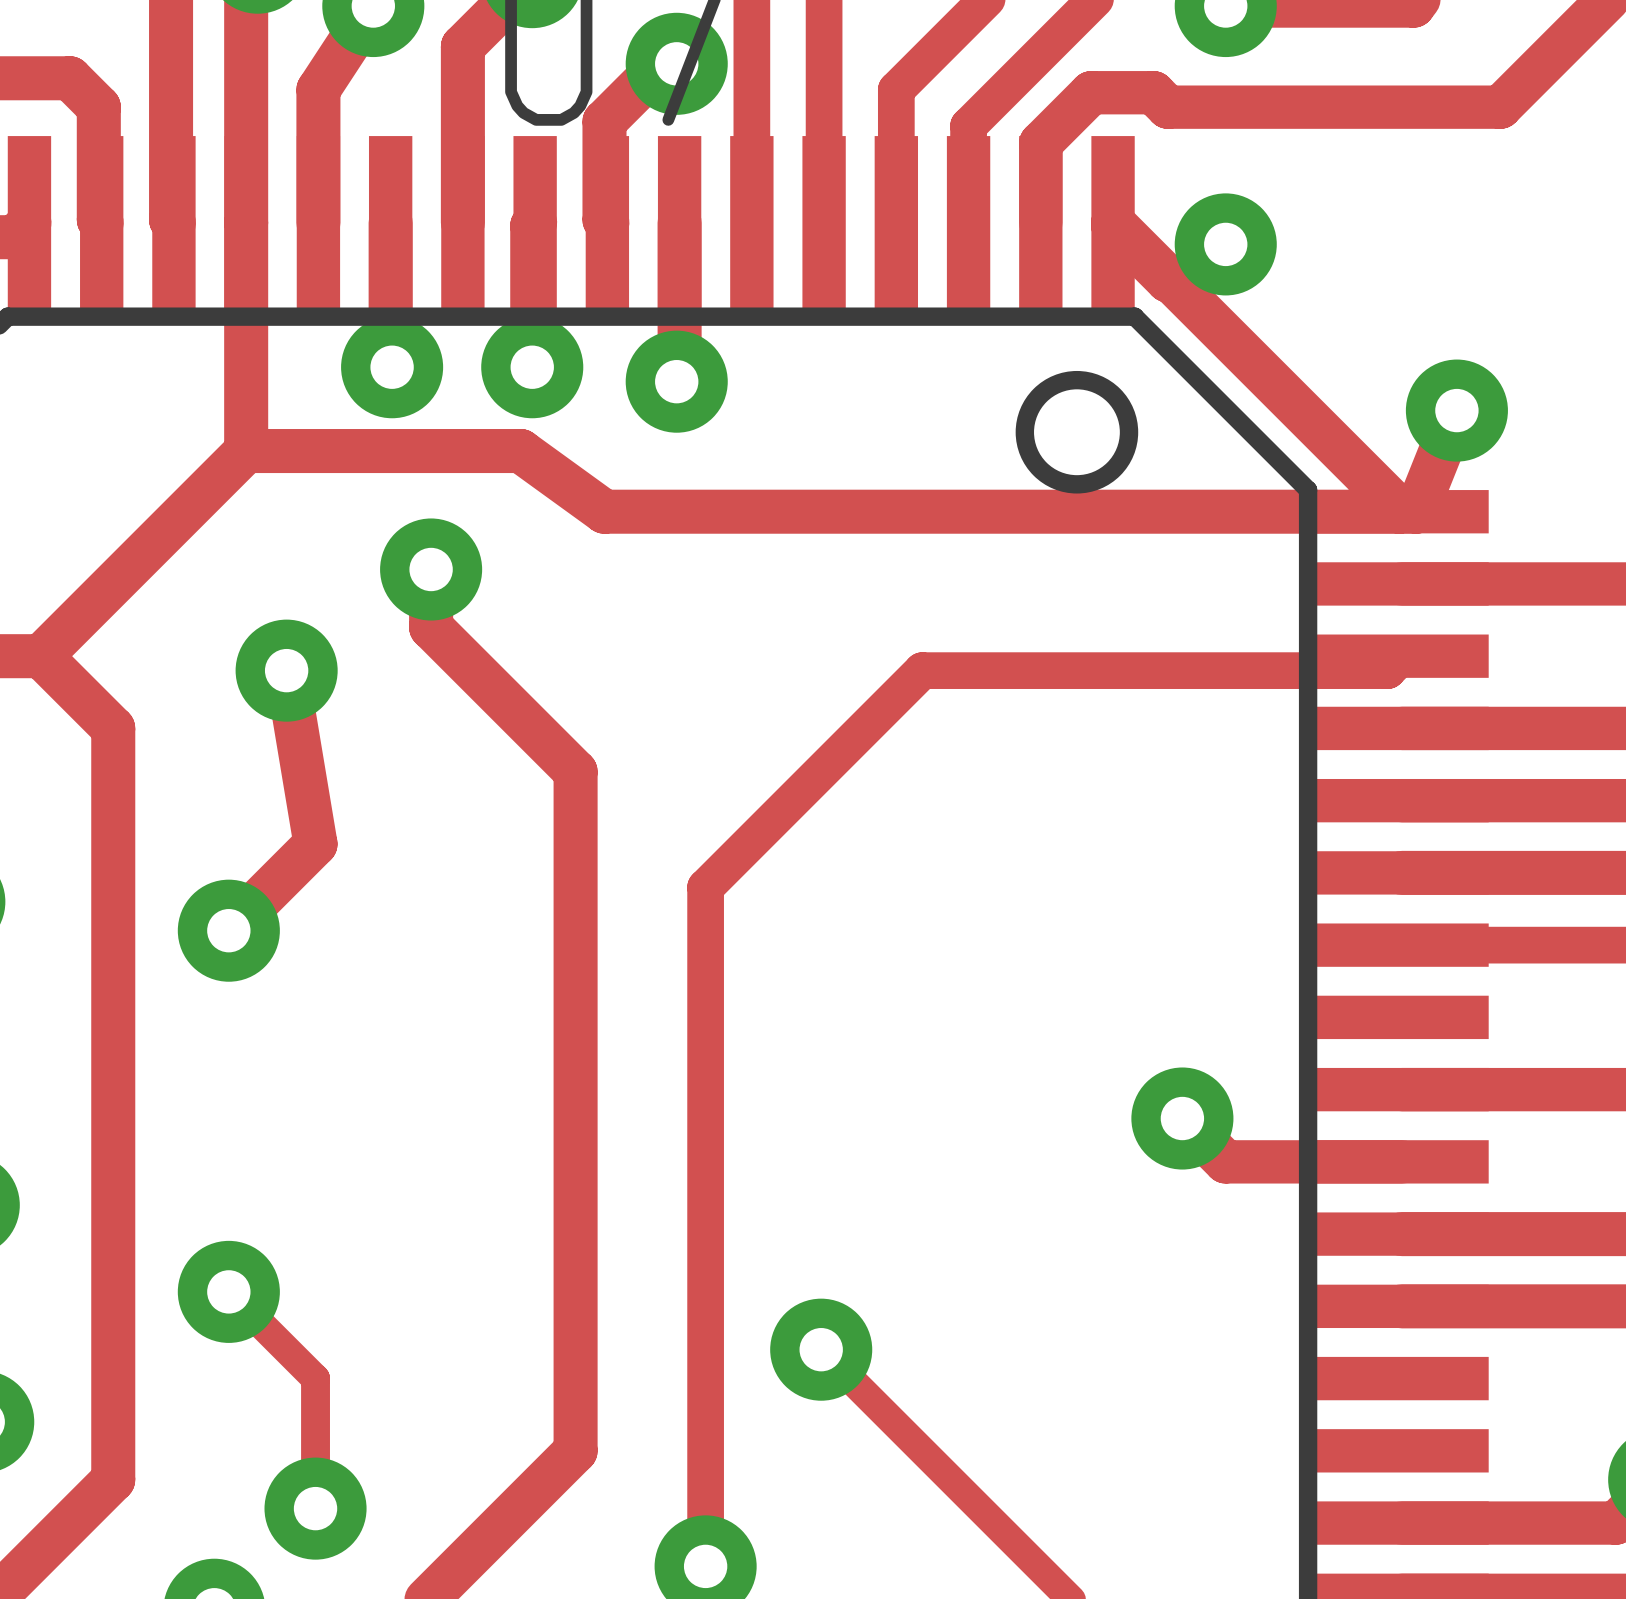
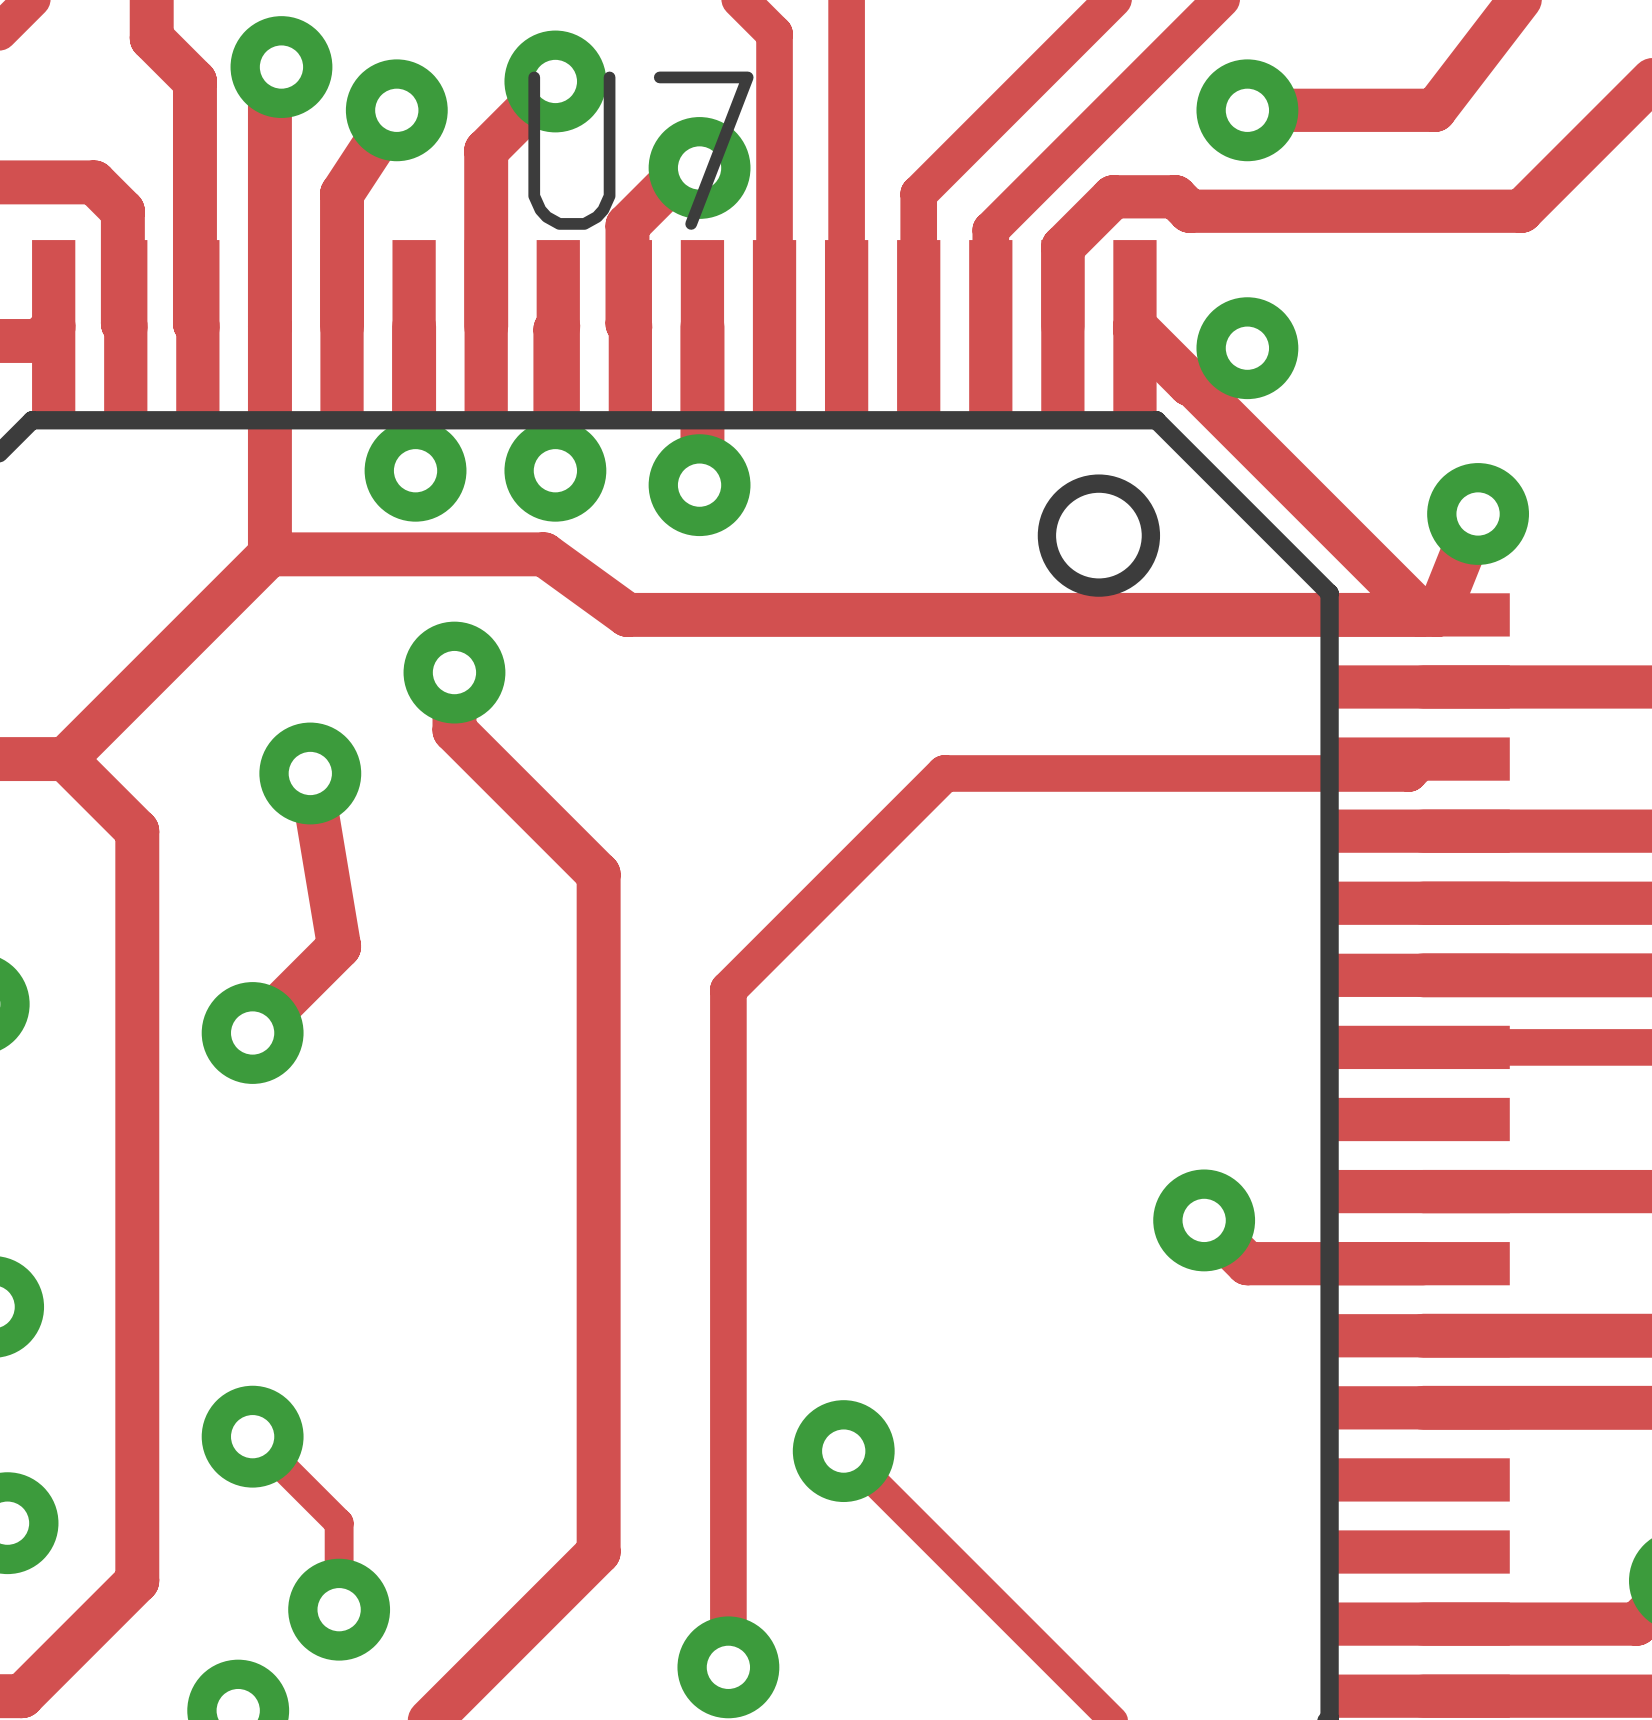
track: (228, 1291) (315, 1378) (315, 1421) -> (252, 1436) (339, 1523)
via position: (228, 1291) -> (252, 1436)

